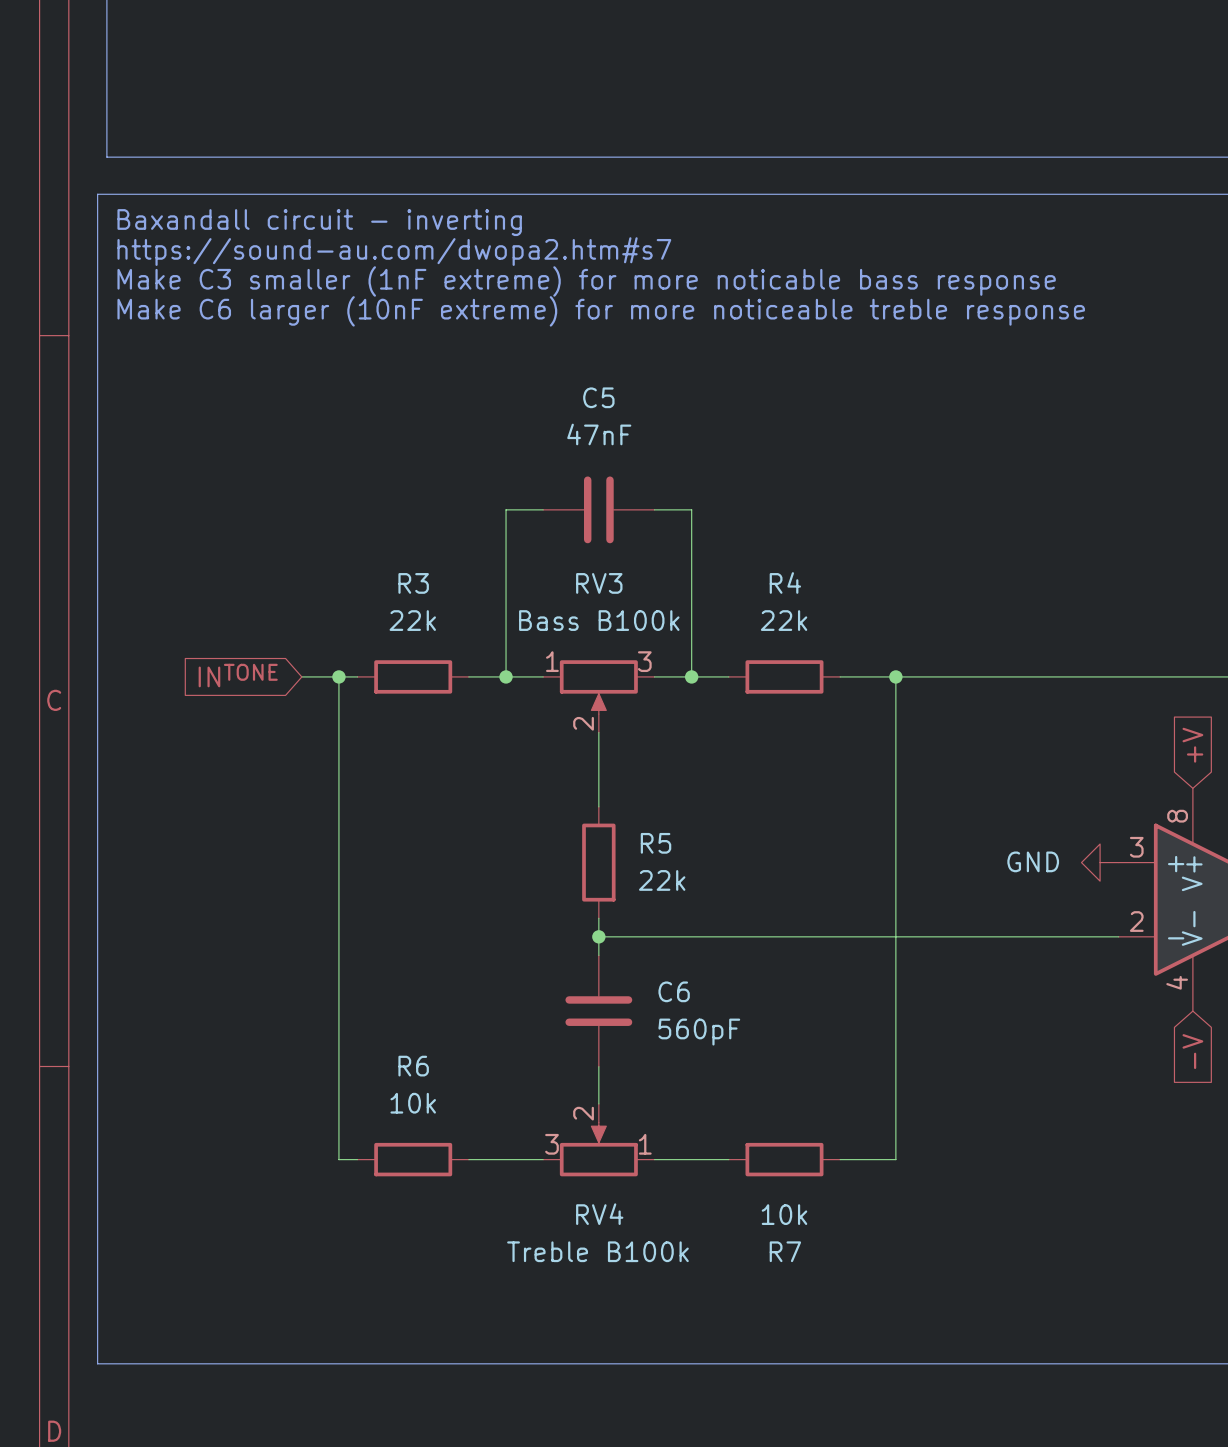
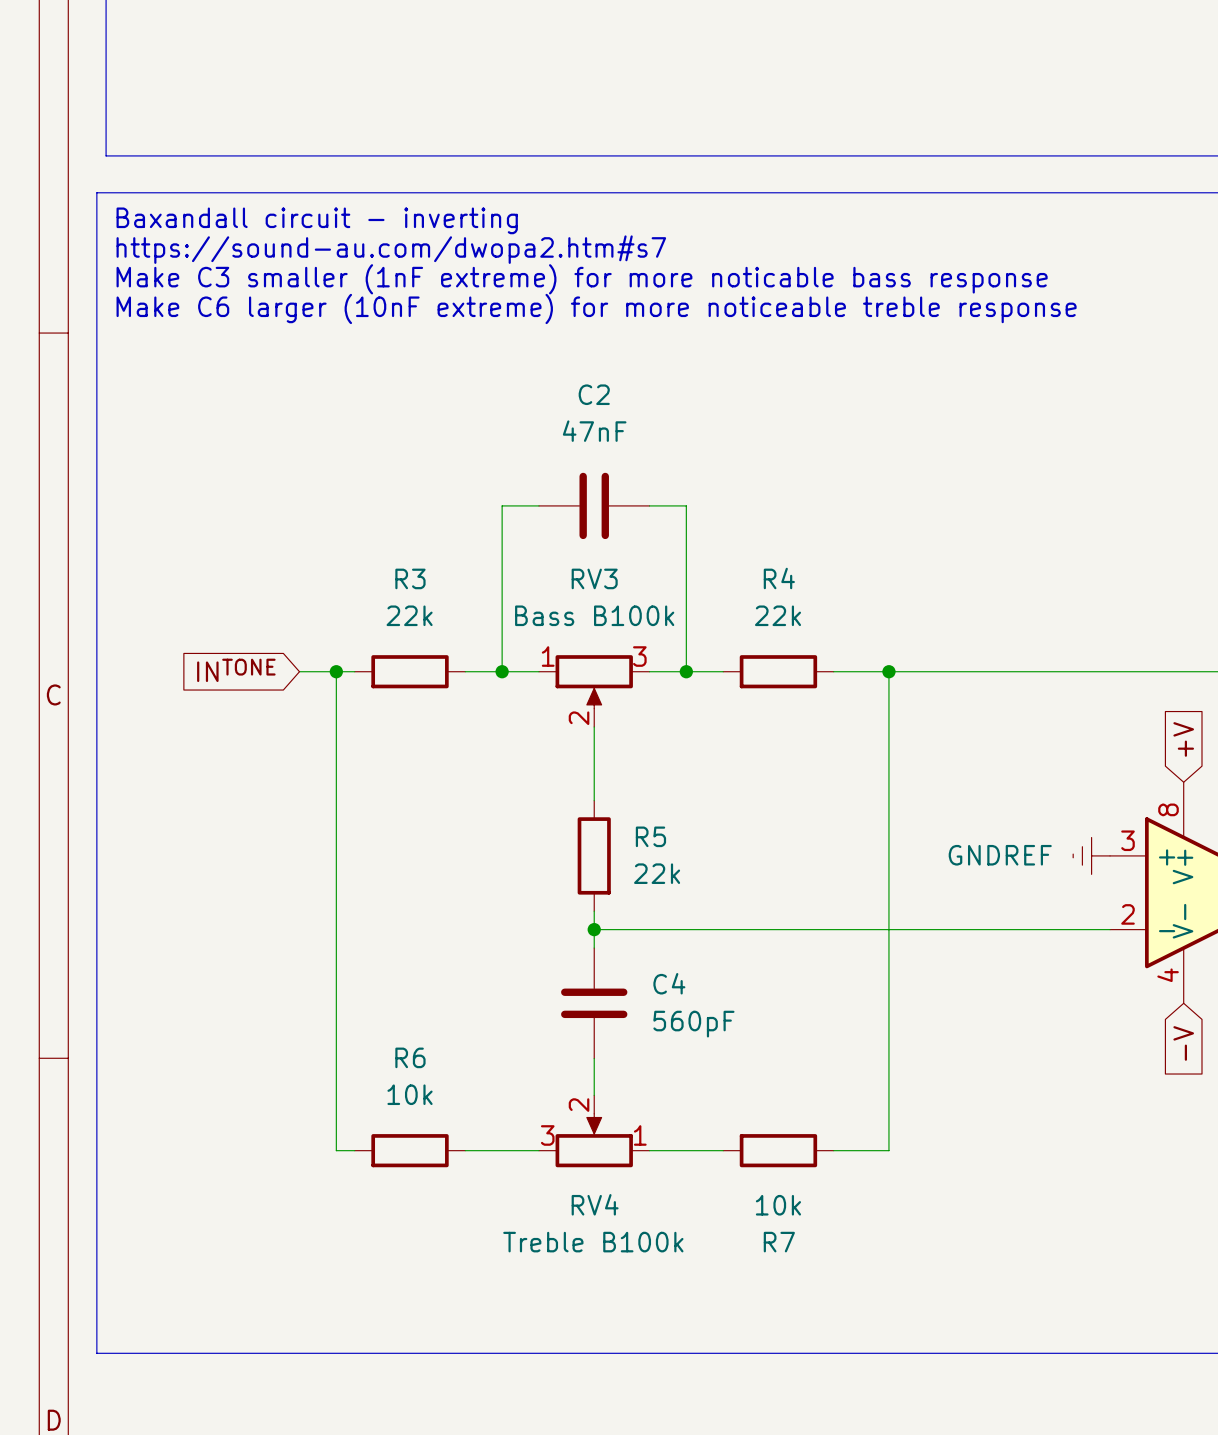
C5 name: C5 (598, 397) -> C2 (594, 394)
power symbol: GND (1100, 862) -> GNDREF (1091, 855)
C6 name: C6 (674, 991) -> C4 (669, 983)

